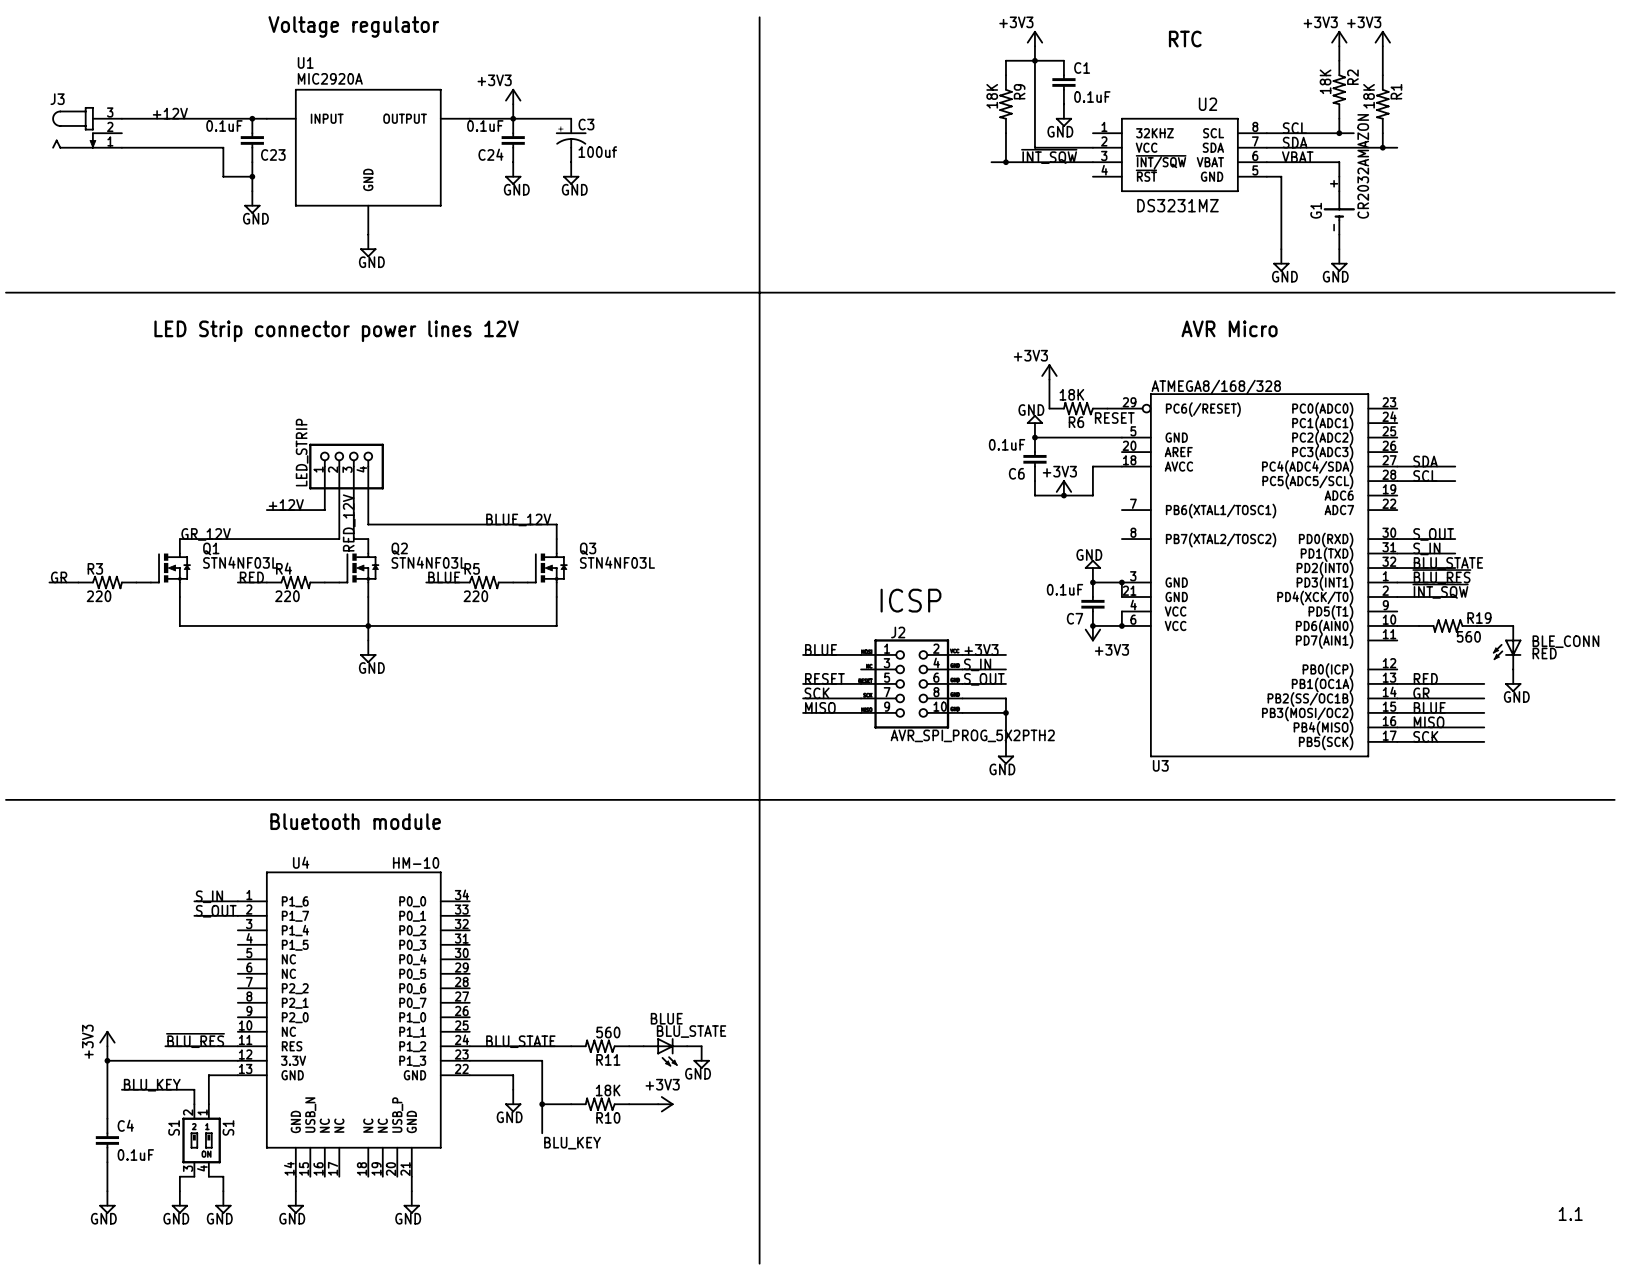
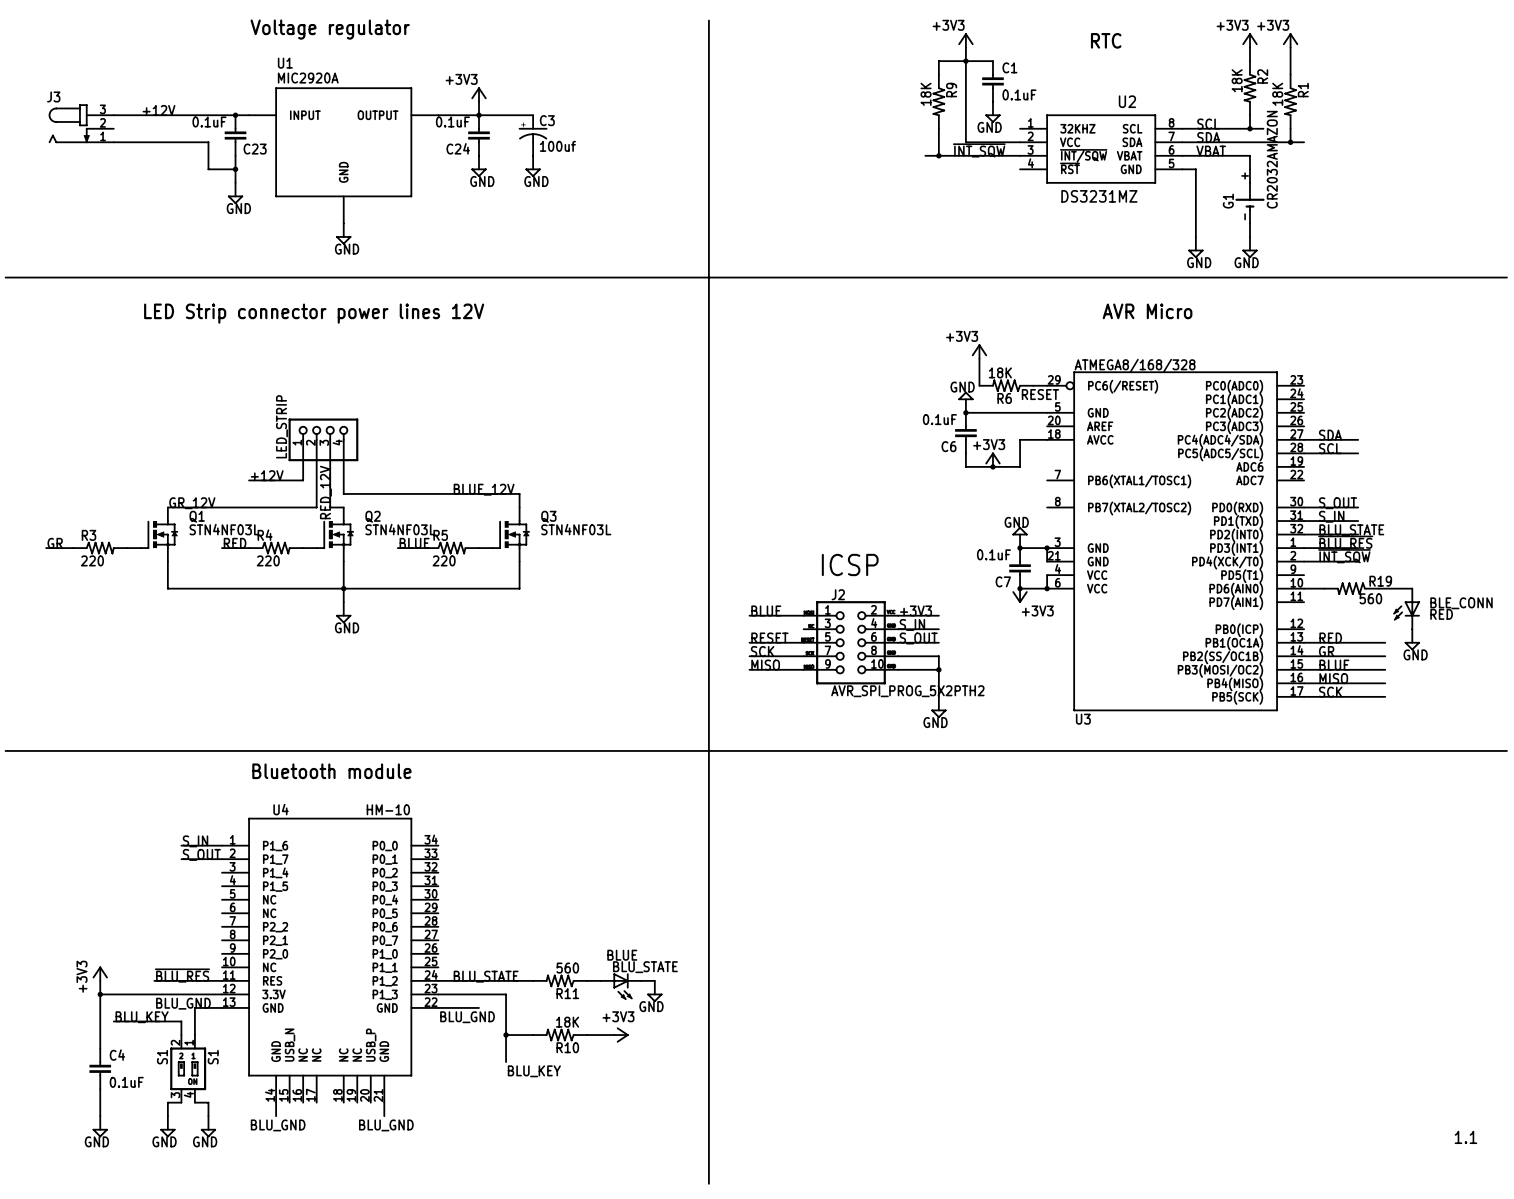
label: none -> BLU_GND (183, 1003)
wire: (513, 1075) (513, 1089) -> none
label: none -> BLU_GND (467, 1017)
power symbol: GND (513, 1100) -> none
label: none -> BLU_GND (278, 1125)
label: none -> BLU_GND (386, 1125)
power symbol: GND (295, 1202) -> none
power symbol: GND (411, 1202) -> none

